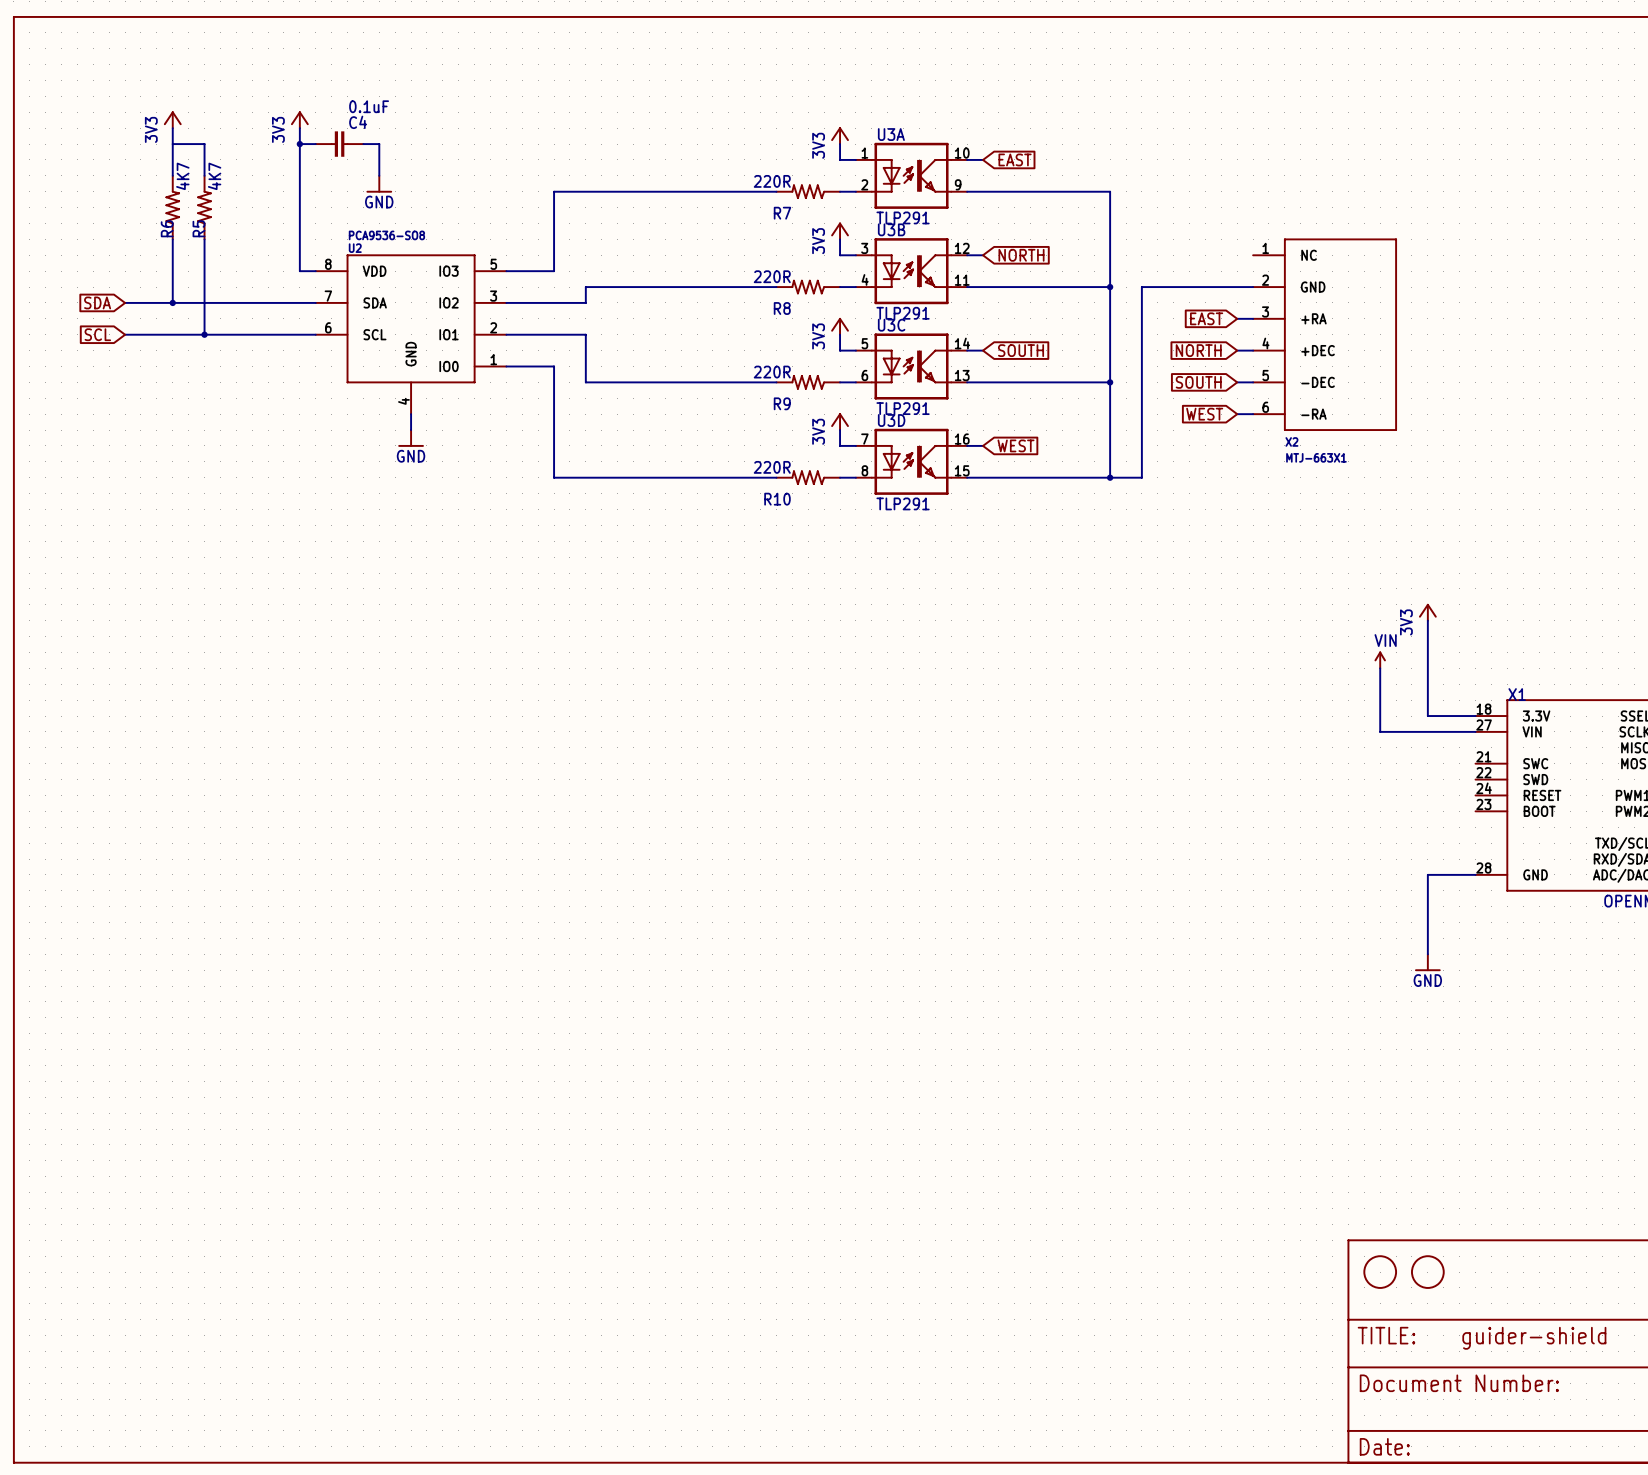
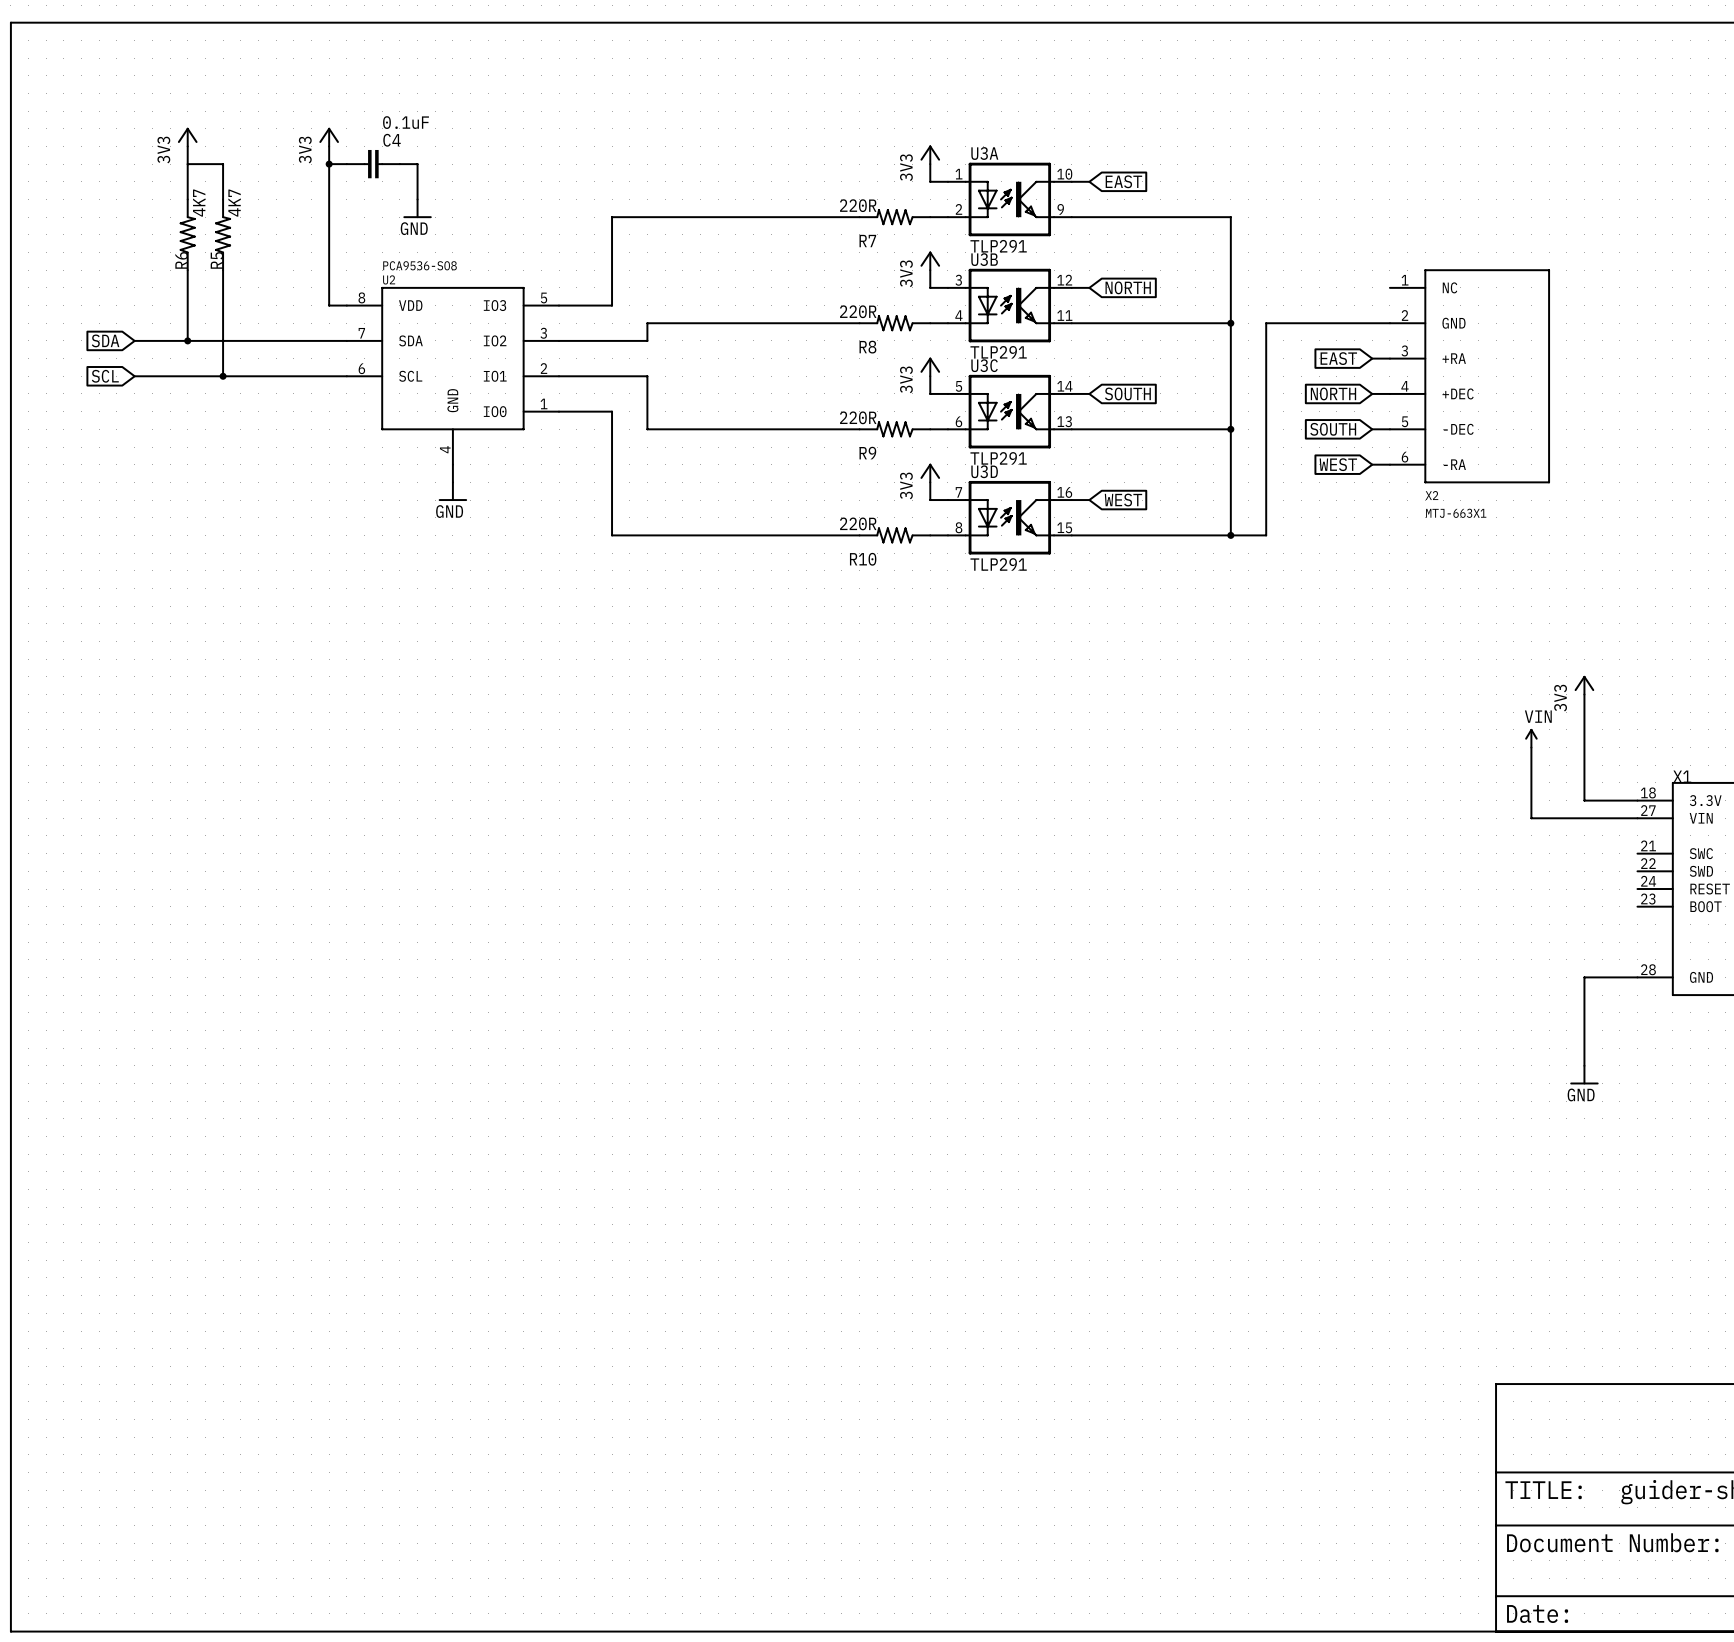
part: (1380, 1272) -> none
part: (1427, 1272) -> none

